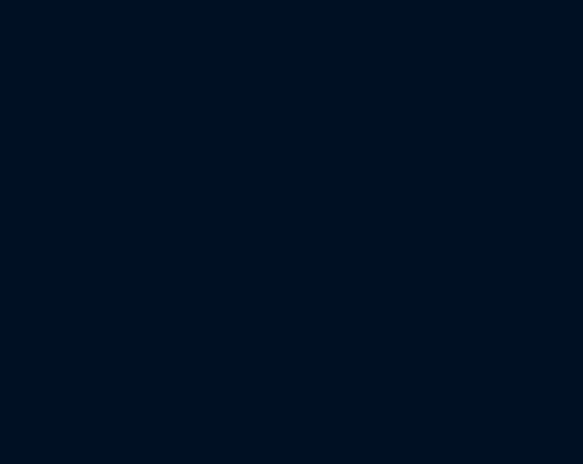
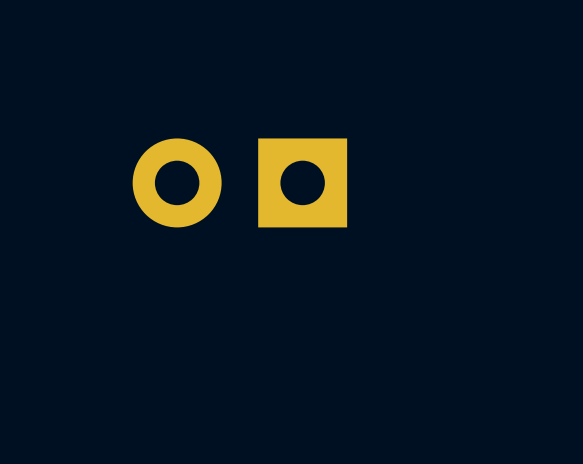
part: none -> (239, 182)

